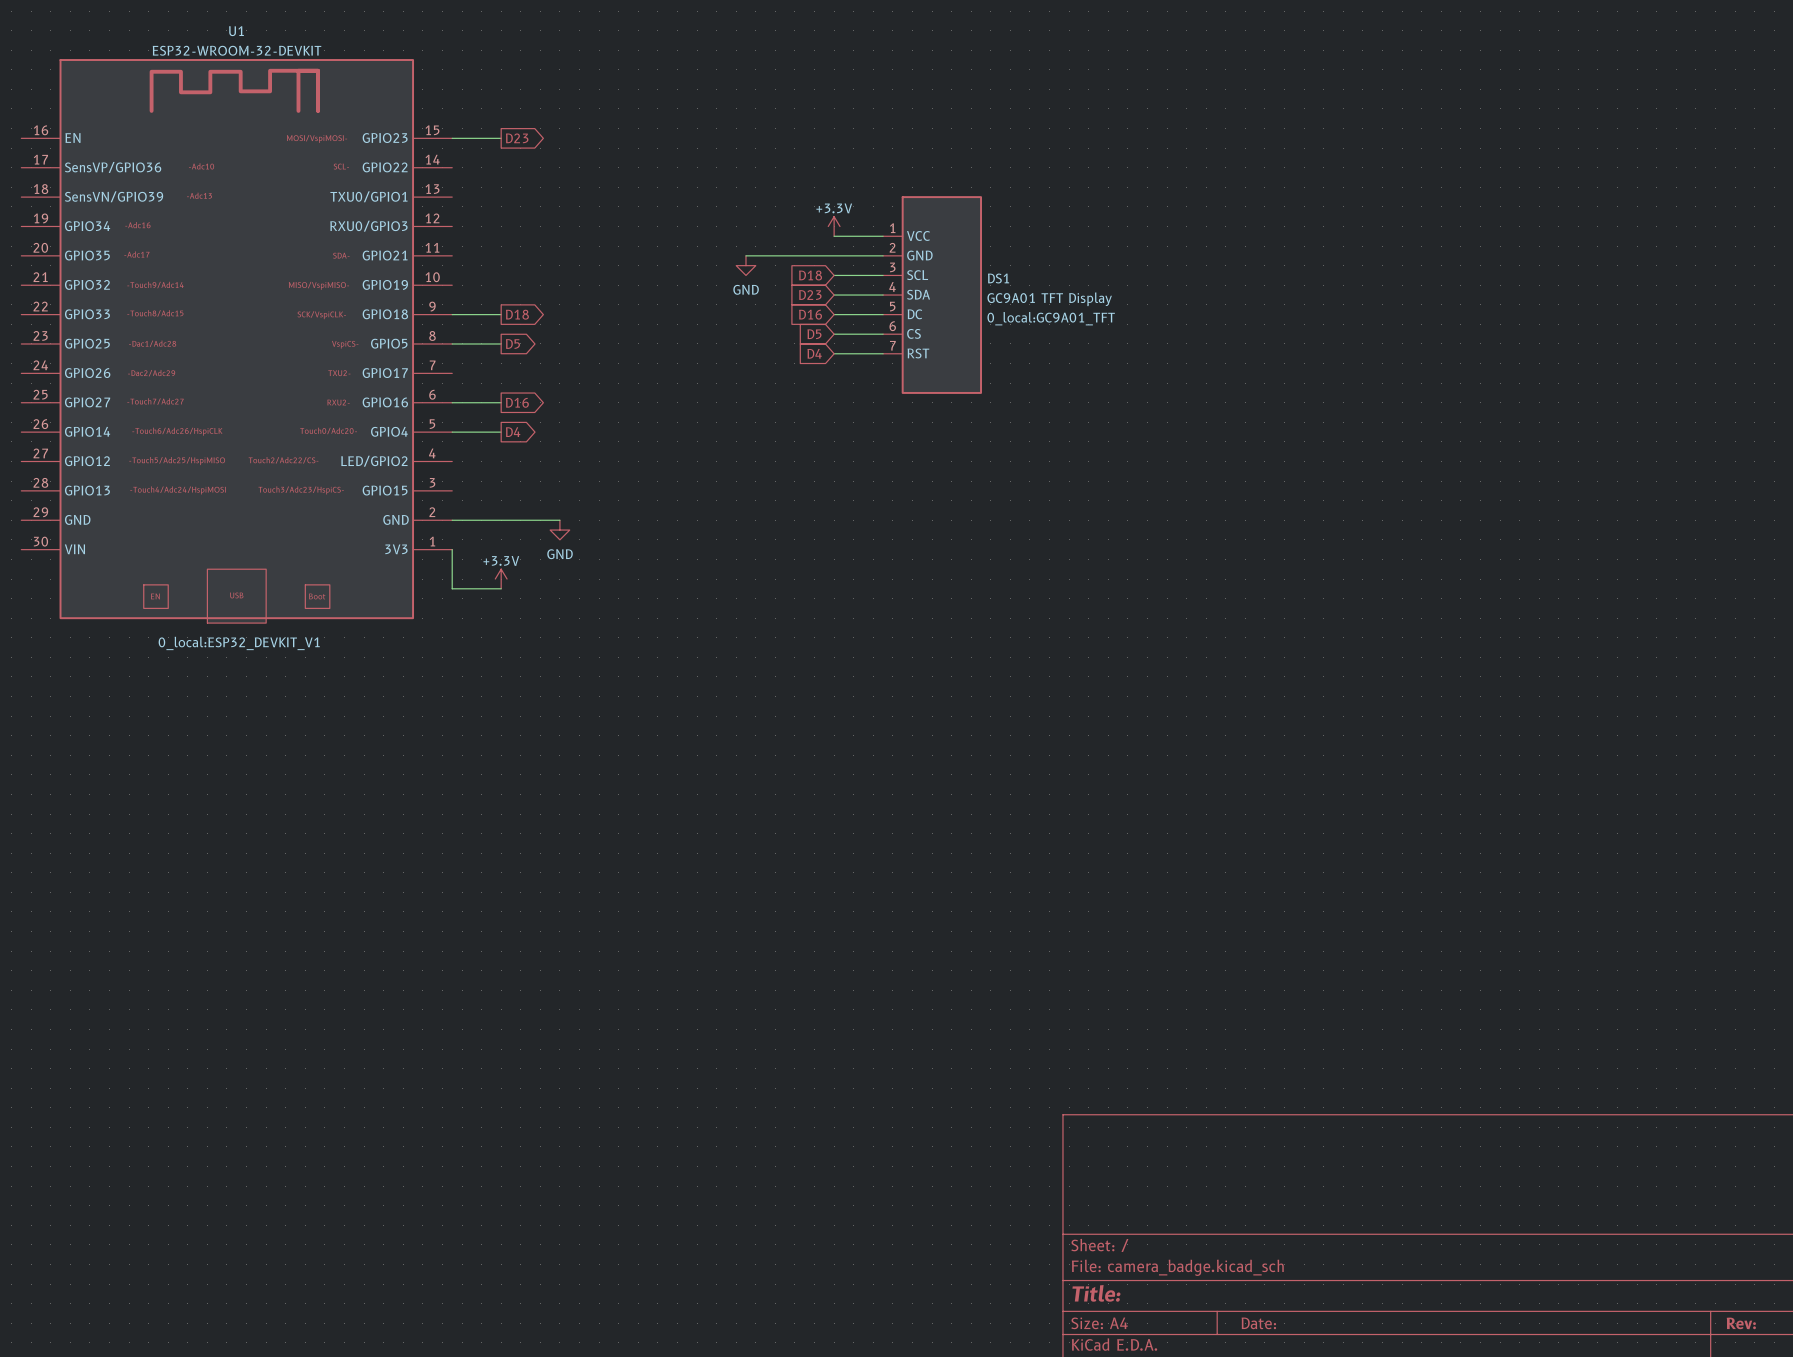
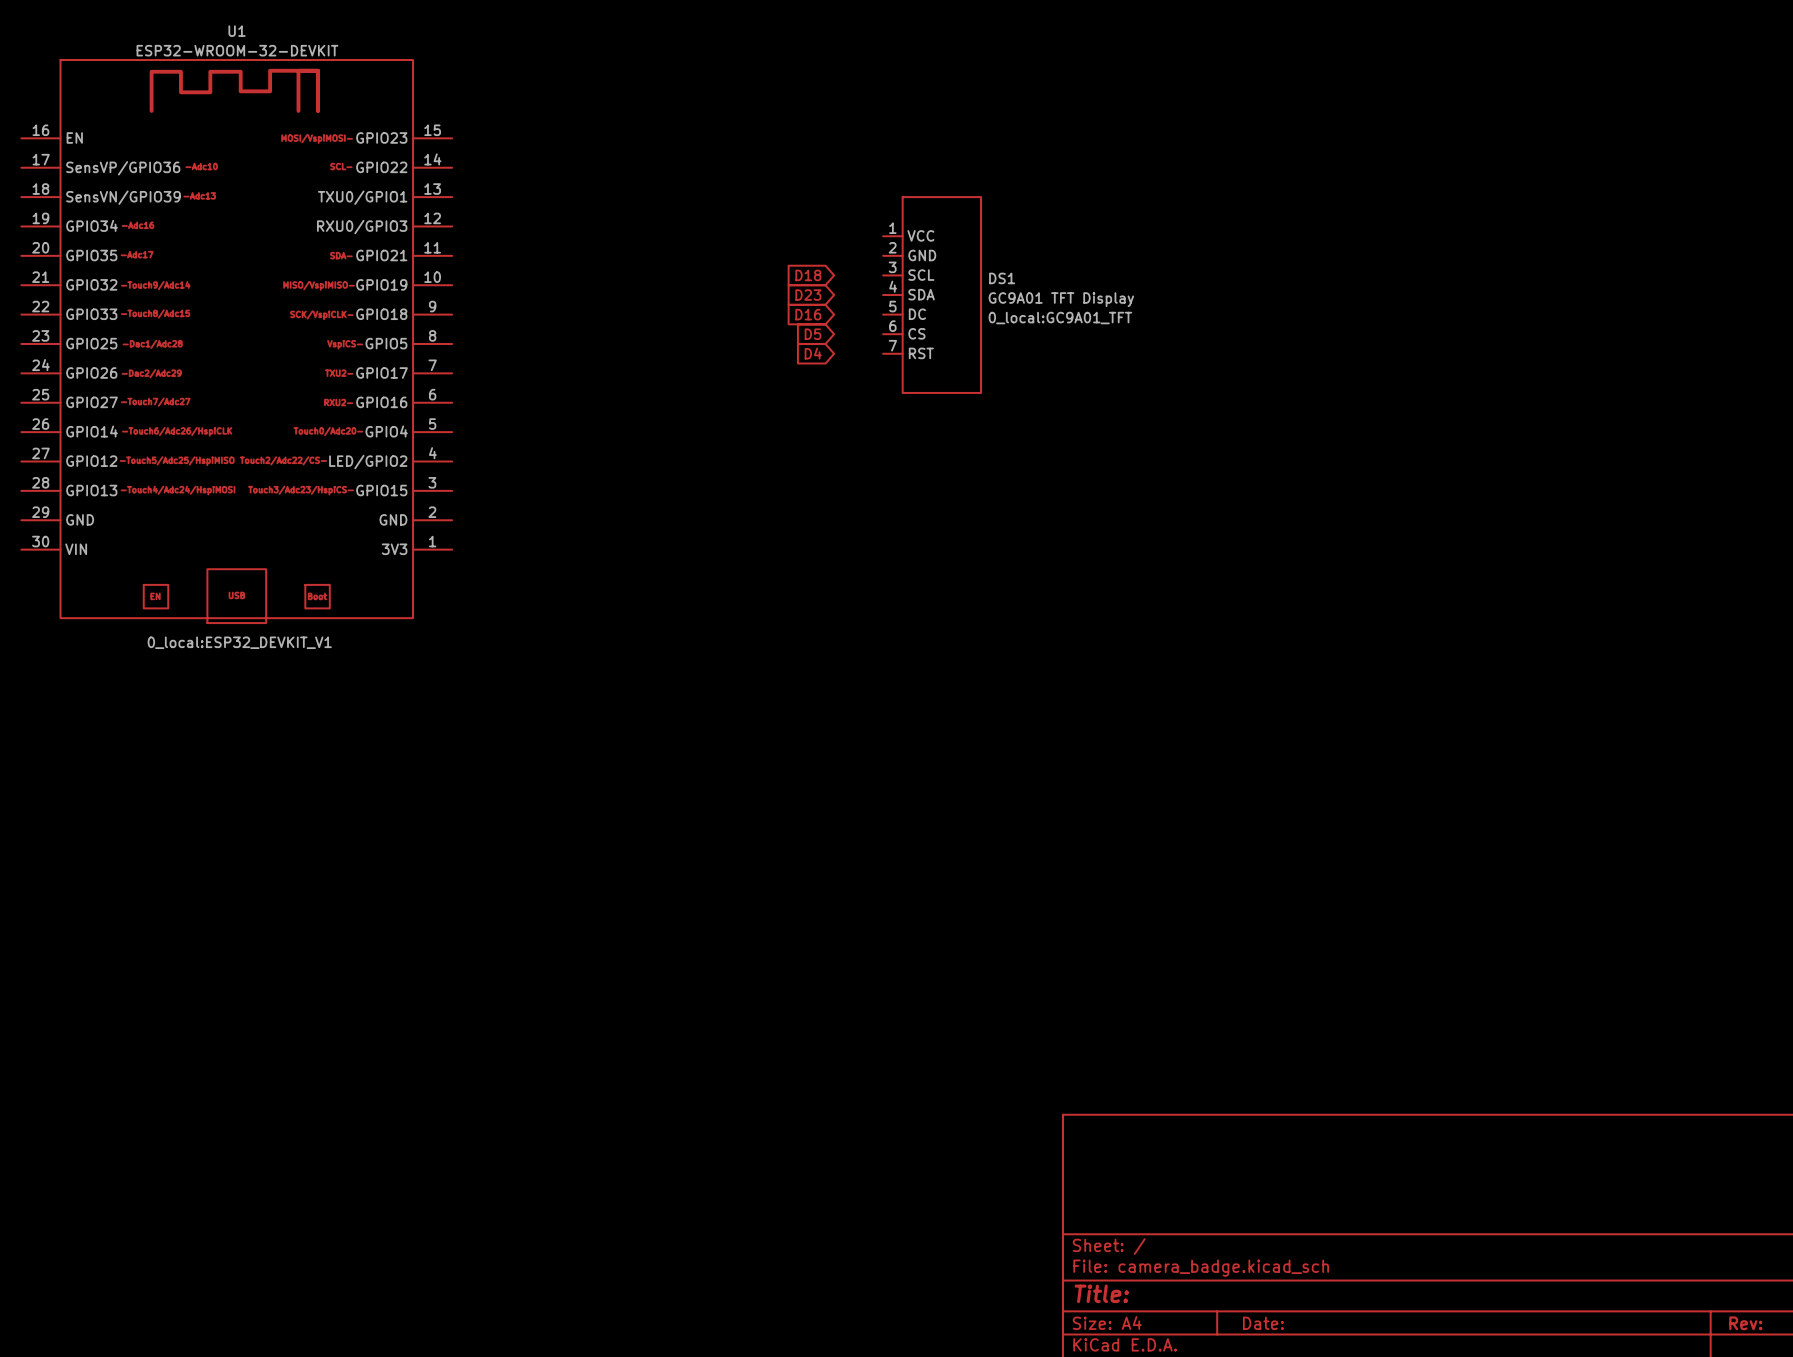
wire: (452, 138) (501, 138) -> none
global label: D23 (517, 138) -> none
power symbol: +3.3V (834, 226) -> none
wire: (834, 236) (883, 236) -> none
wire: (745, 255) (883, 255) -> none
power symbol: GND (745, 265) -> none
wire: (834, 275) (883, 275) -> none
wire: (834, 295) (883, 295) -> none
wire: (452, 314) (501, 314) -> none
global label: D18 (517, 314) -> none
wire: (834, 314) (883, 314) -> none
wire: (834, 334) (883, 334) -> none
wire: (452, 343) (501, 343) -> none
global label: D5 (512, 344) -> none
wire: (834, 353) (883, 353) -> none
wire: (452, 402) (501, 402) -> none
global label: D16 (517, 402) -> none
wire: (452, 432) (501, 432) -> none
global label: D4 (513, 432) -> none
wire: (452, 520) (559, 520) -> none
power symbol: GND (559, 530) -> none
wire: (452, 549) (452, 588) (501, 588) -> none
power symbol: +3.3V (501, 579) -> none

